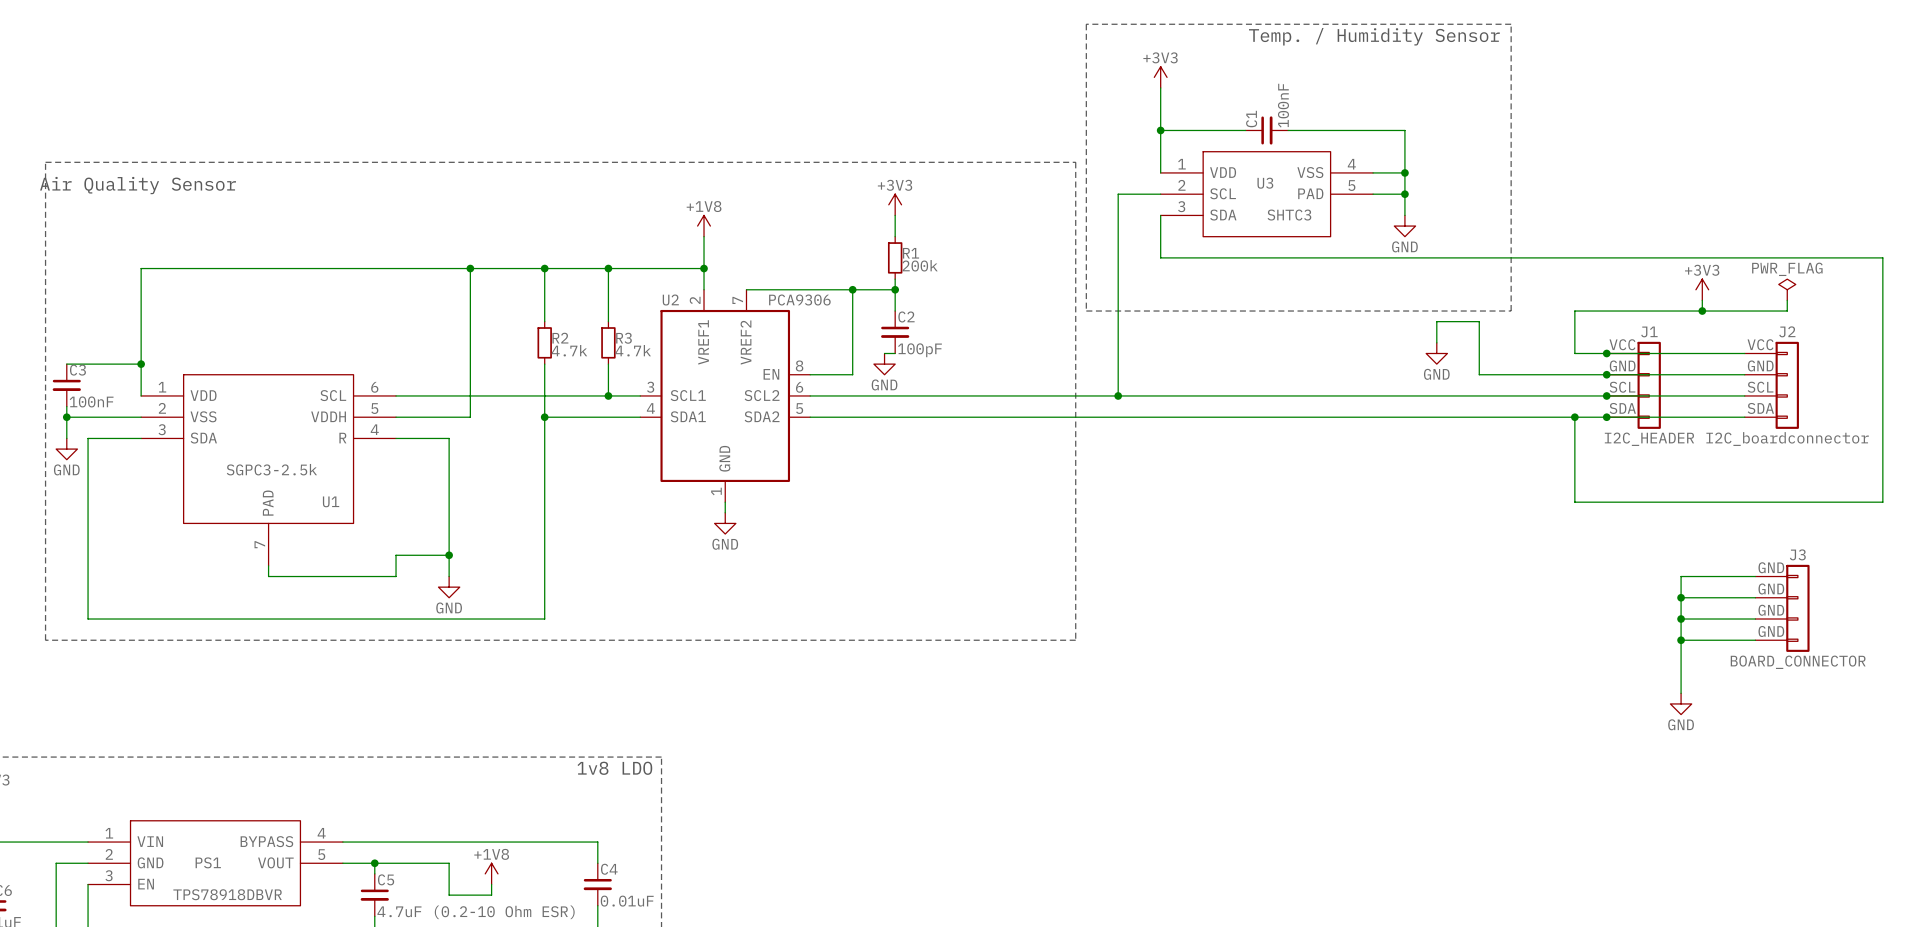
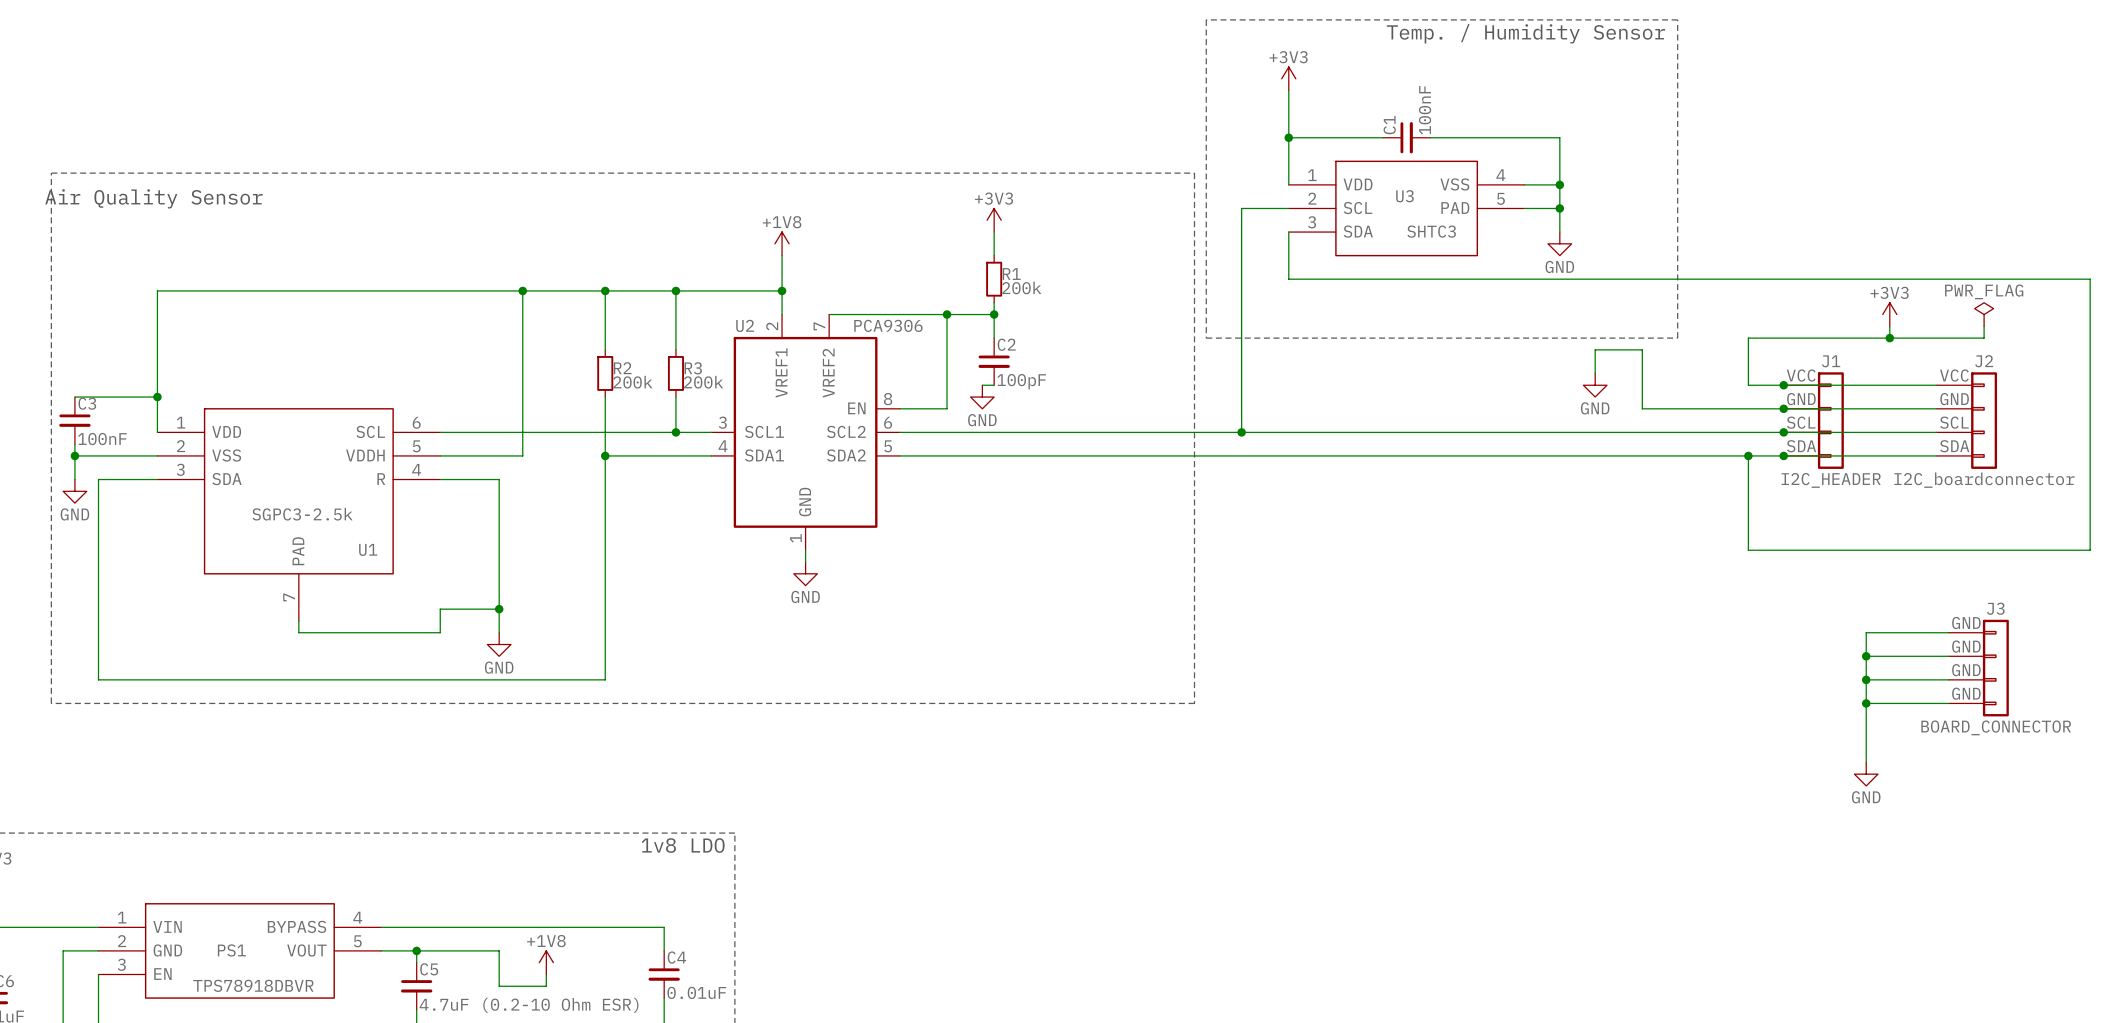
R2 value: 4.7k (569, 350) -> 200k (632, 382)
R3 value: 4.7k (633, 350) -> 200k (703, 382)

